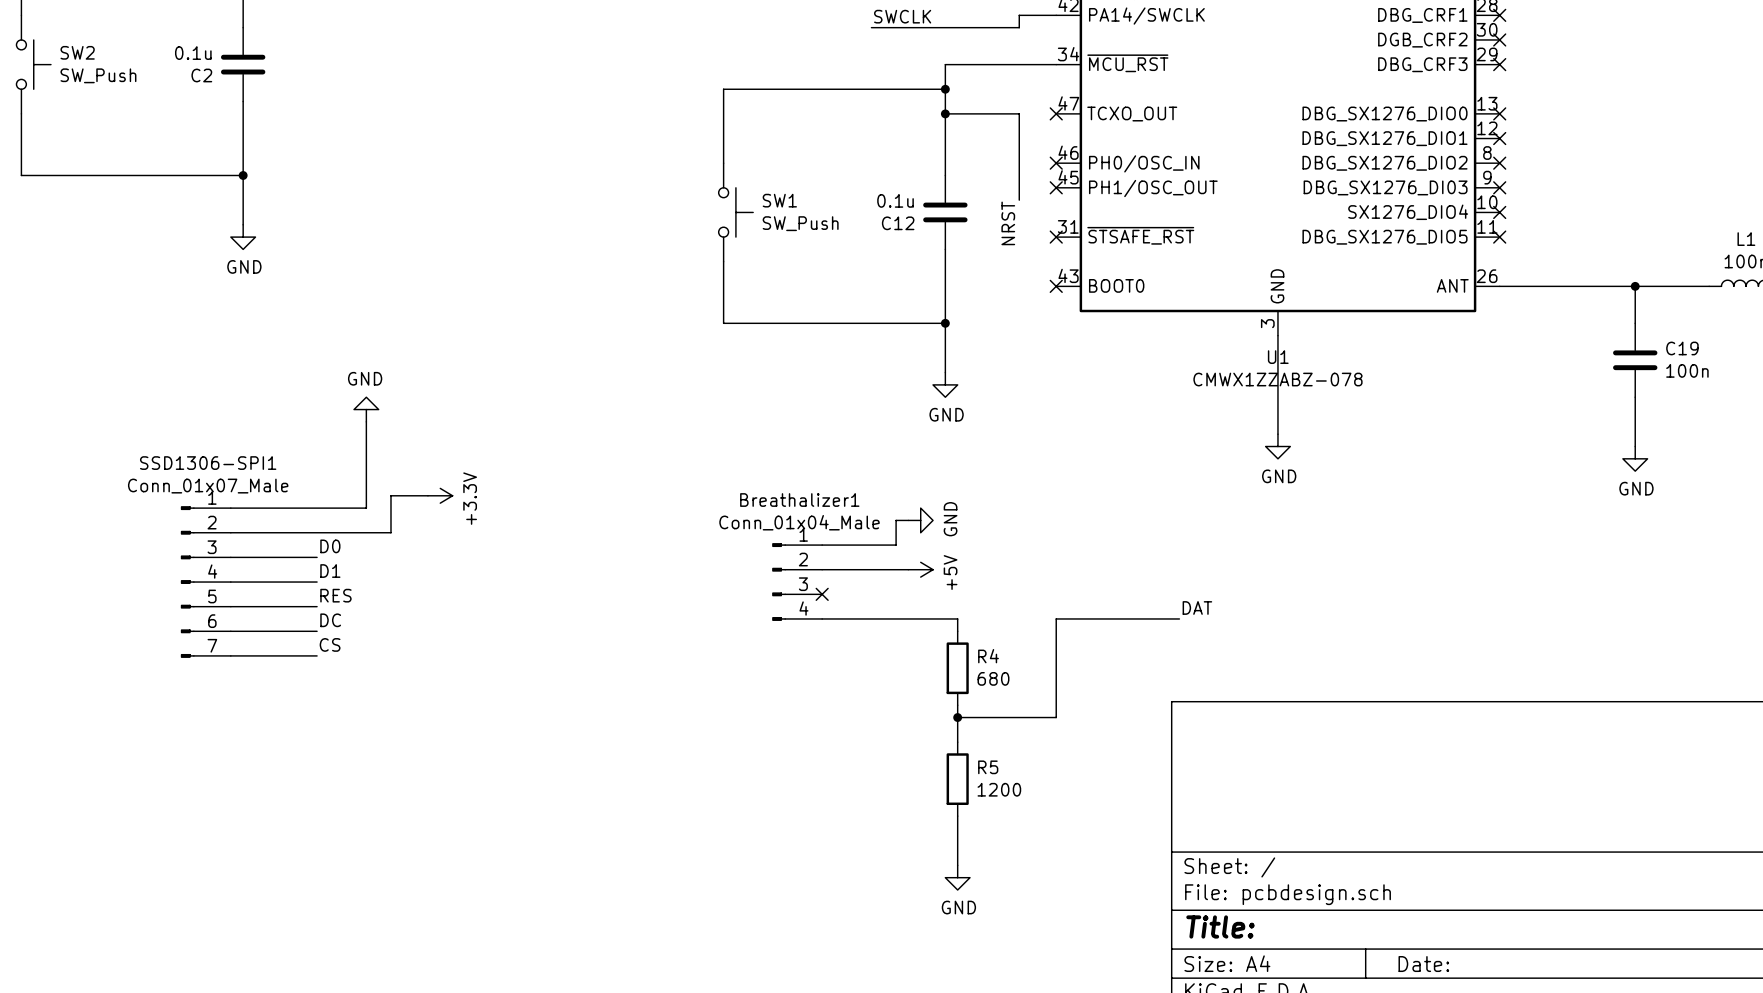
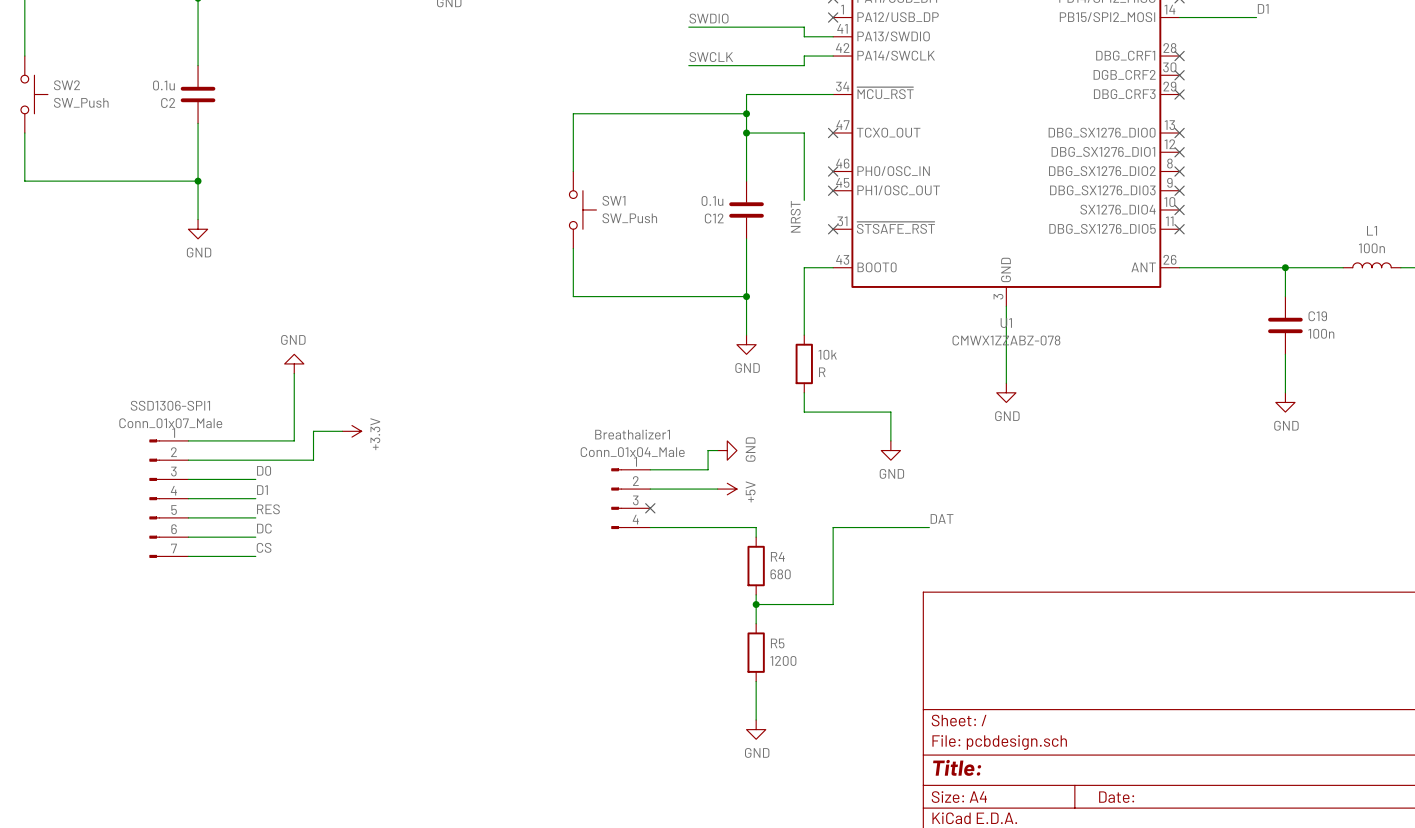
wire: none -> (833, 267) (804, 267) (804, 335)
no-connect mark: (1056, 286) -> none
10k: none -> R (804, 363)
wire: none -> (804, 392) (804, 412) (890, 412) (890, 440)
power symbol: none -> GND (890, 450)

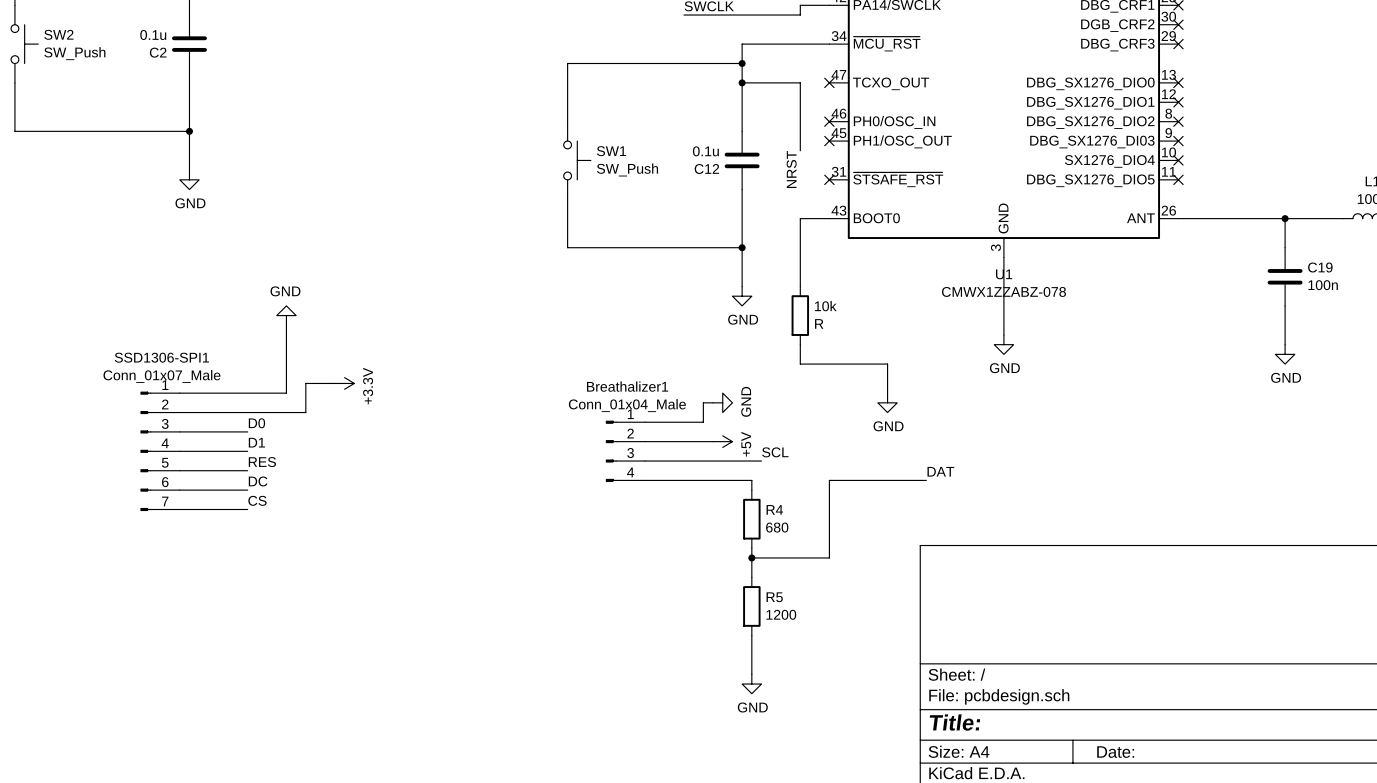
label: none -> SCL (775, 452)
wire: none -> (645, 461) (761, 461)
no-connect mark: (650, 508) -> none

